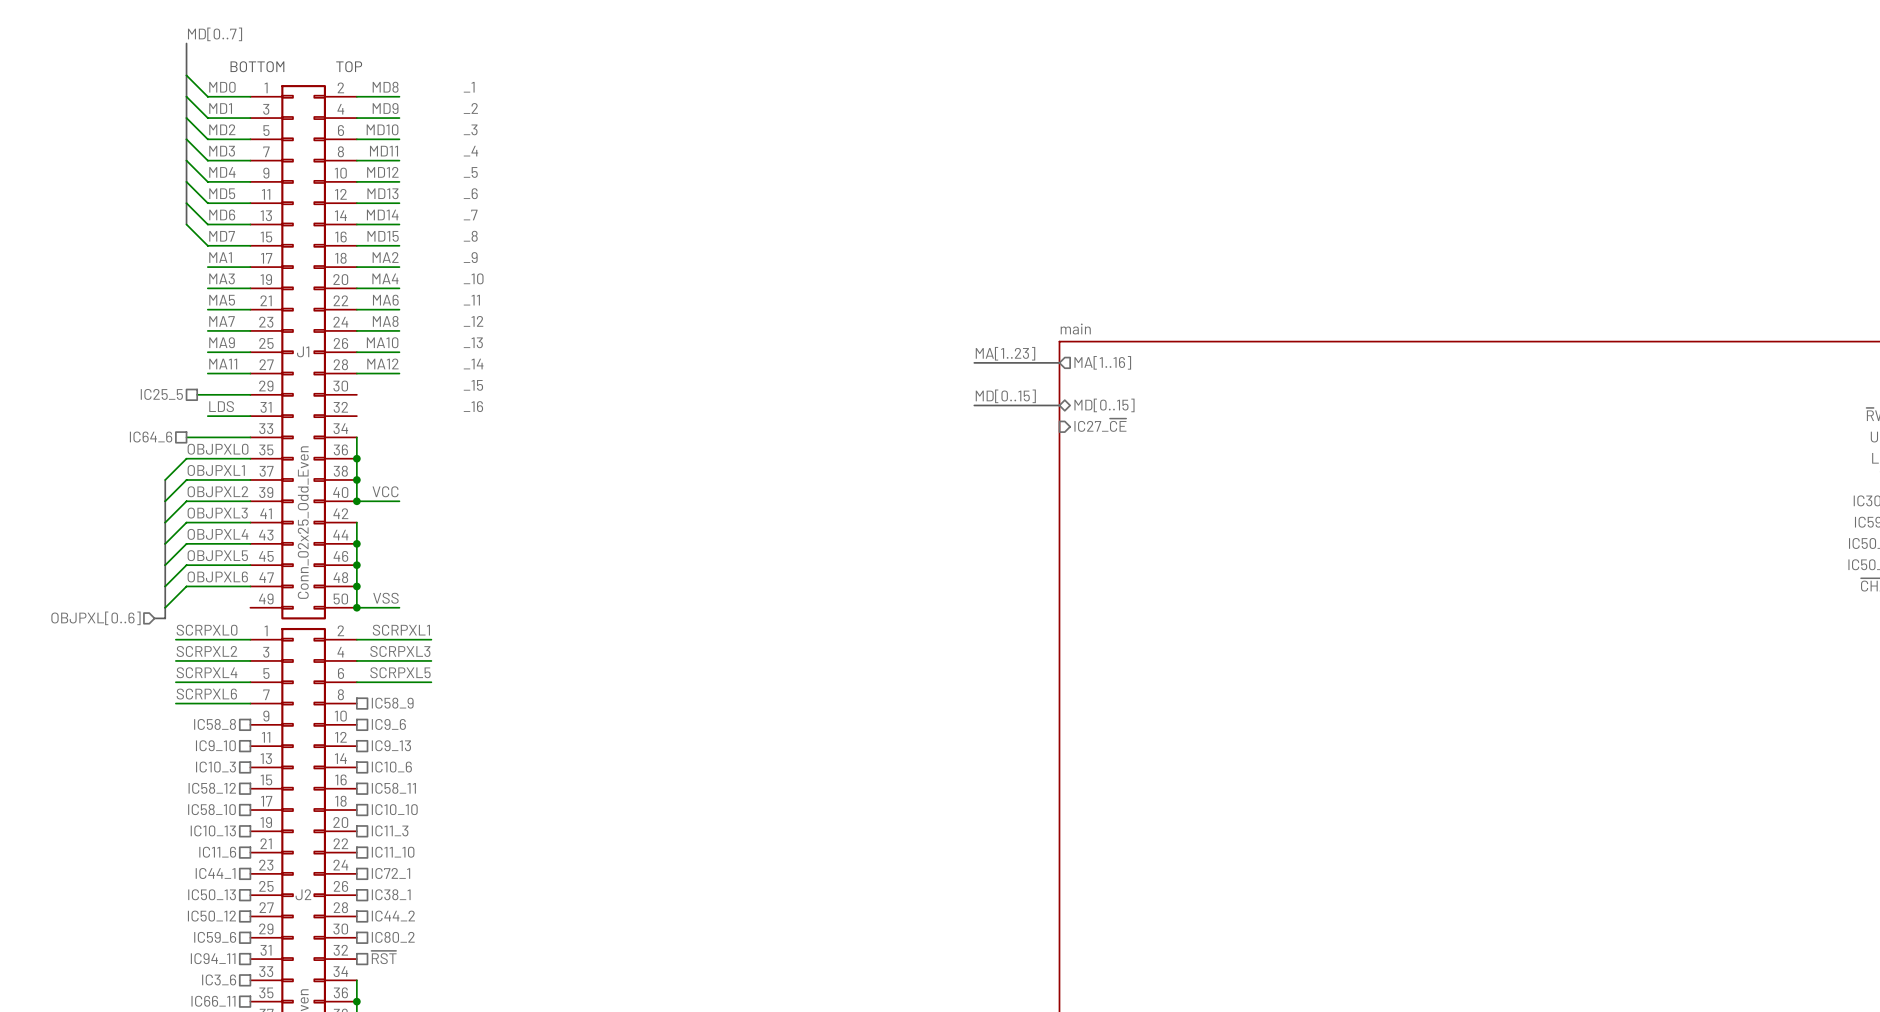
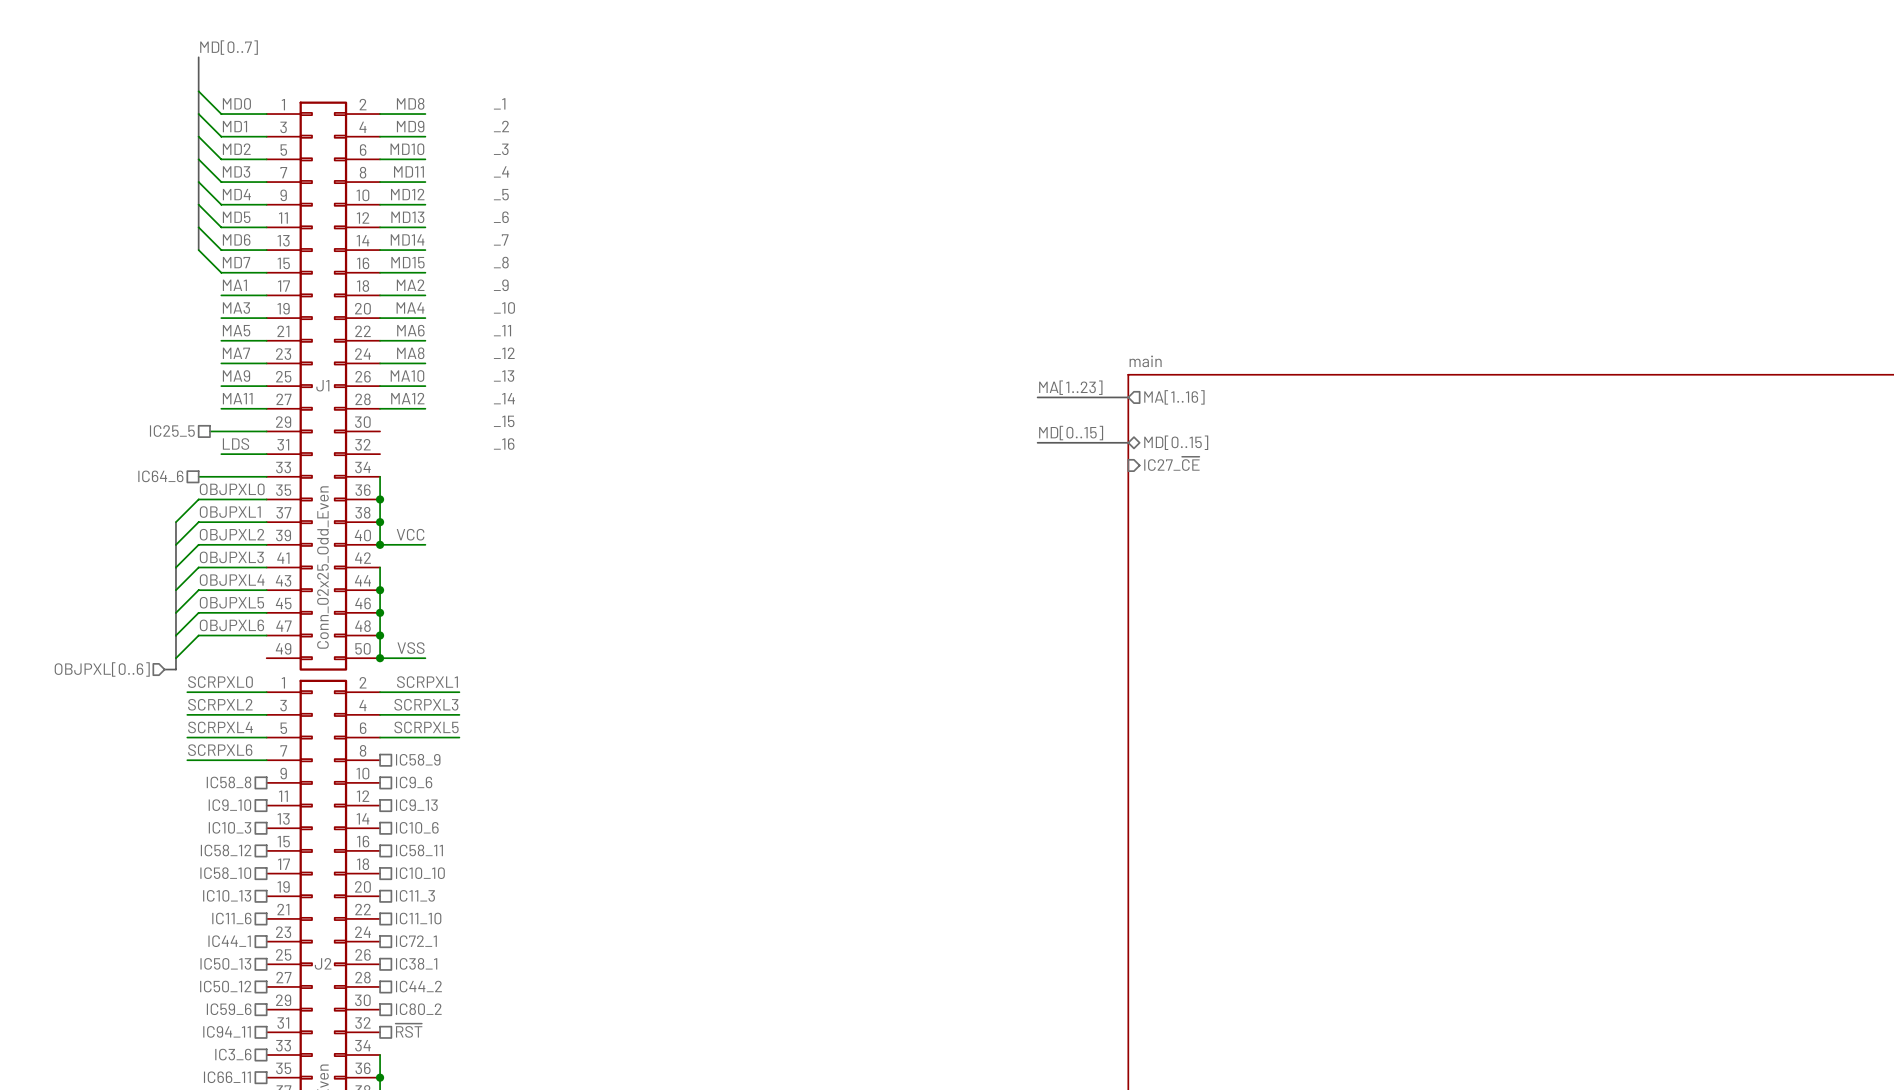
text: BOTTOM (257, 66) -> none
text: TOP (349, 66) -> none

